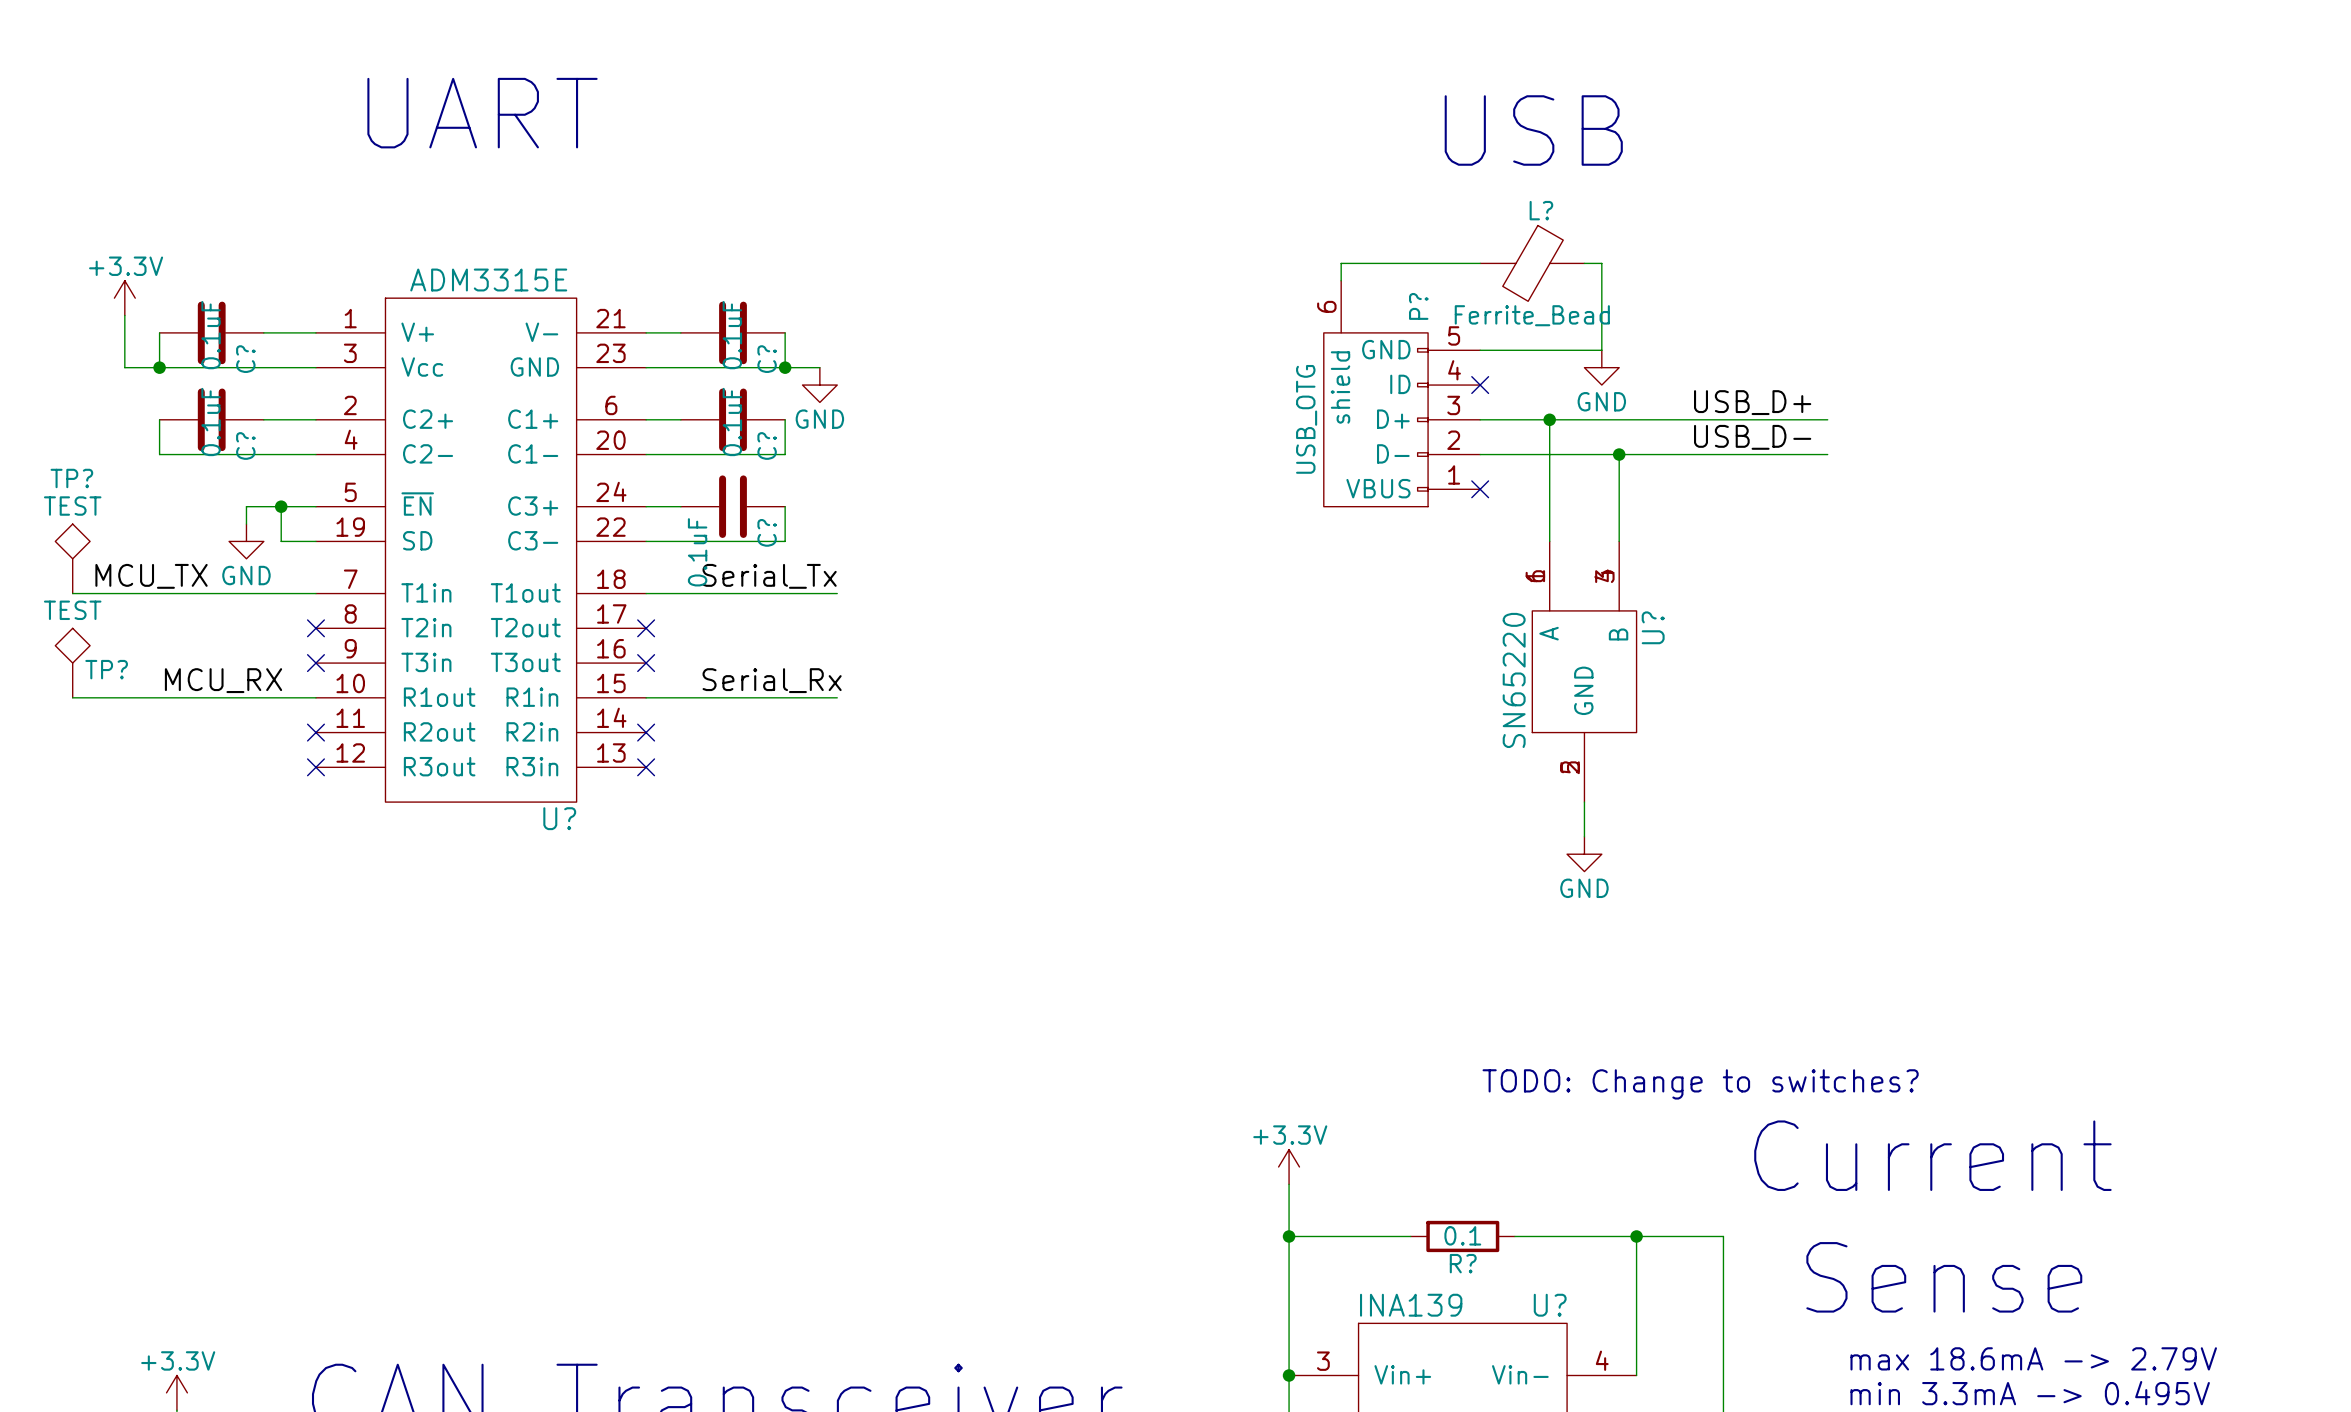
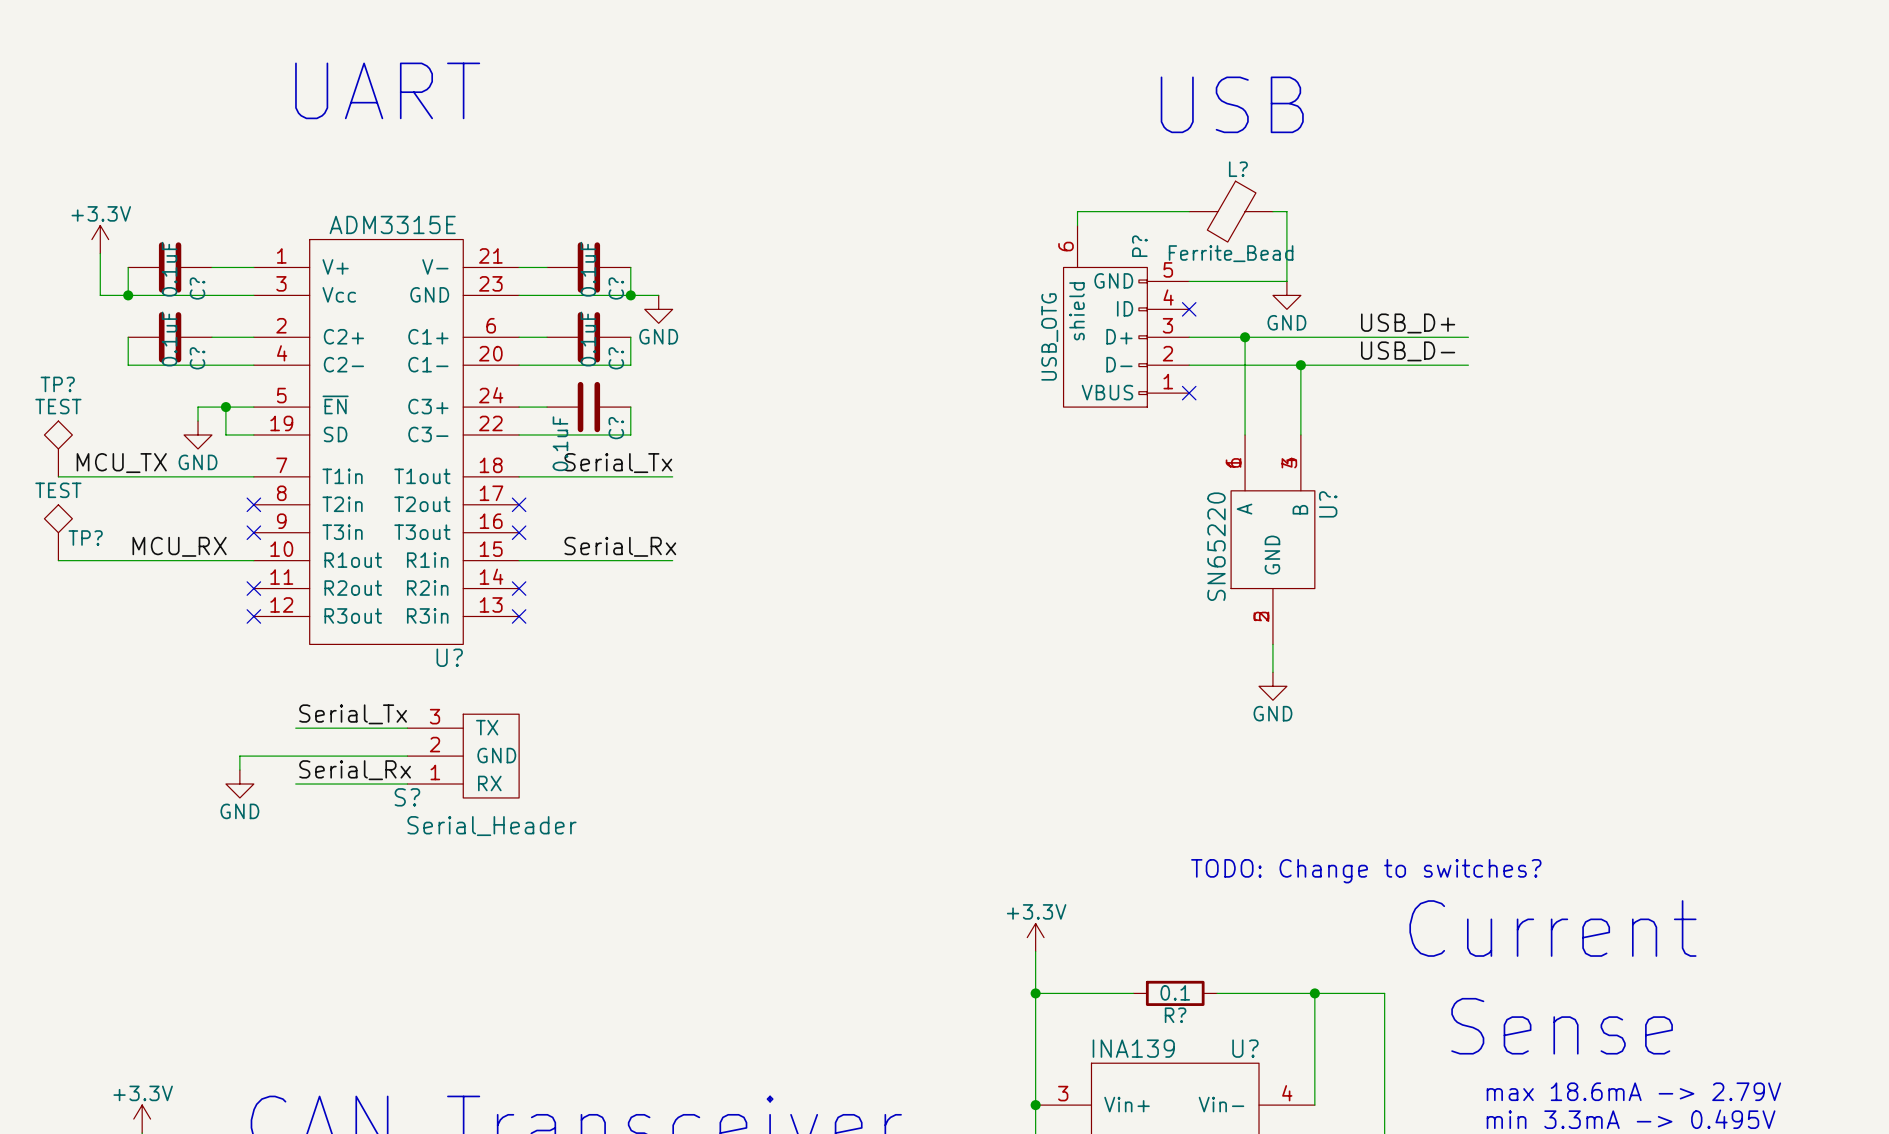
label: none -> Serial_Tx (353, 714)
wire: none -> (295, 728) (407, 728)
wire: none -> (407, 756) (239, 756) (239, 770)
S?: none -> Serial_Header (463, 756)
label: none -> Serial_Rx (355, 770)
power symbol: none -> GND (239, 784)
wire: none -> (295, 784) (407, 784)

